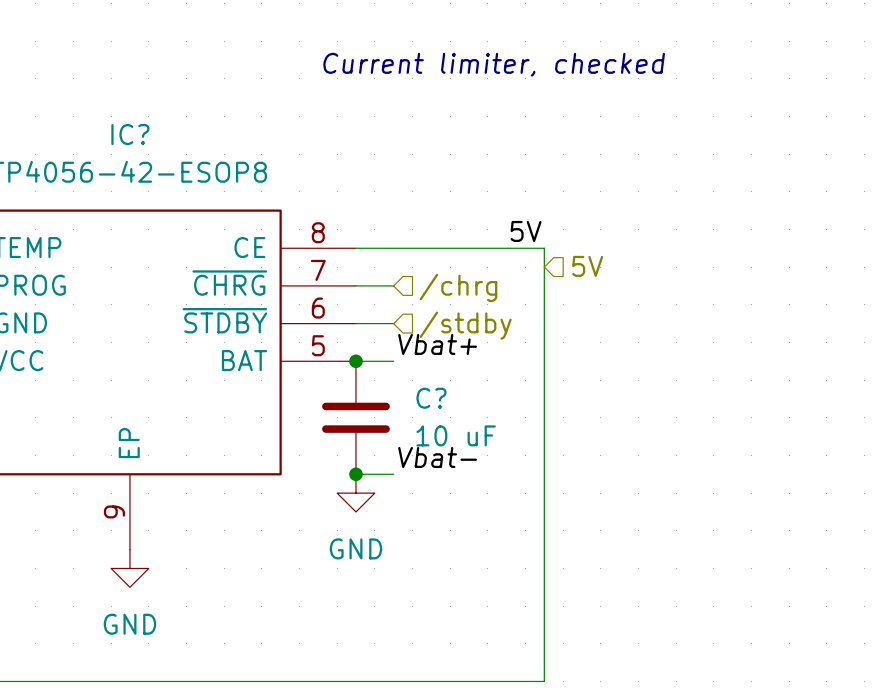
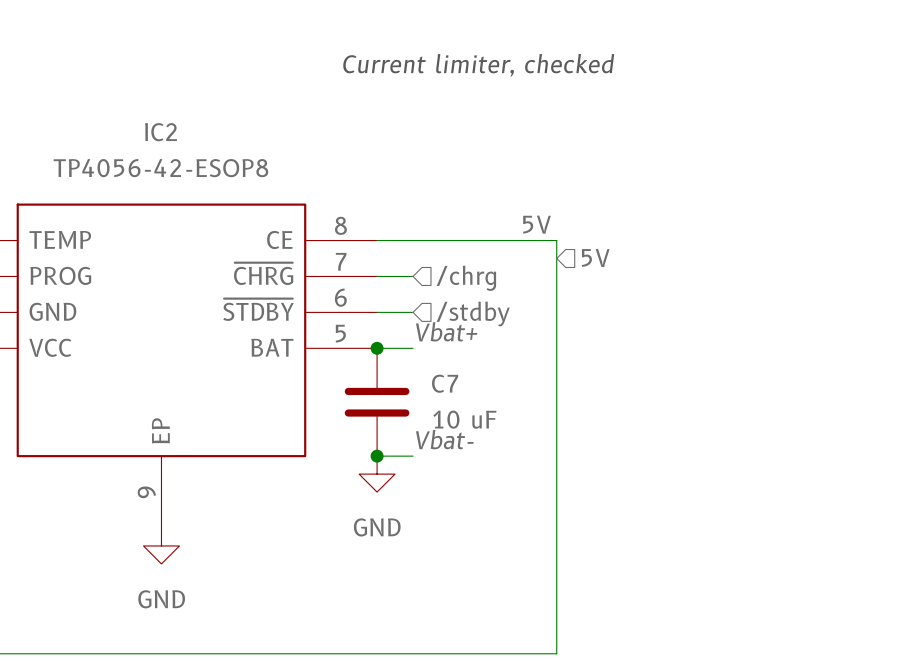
IC? name: IC? (130, 134) -> IC2 (160, 132)
C? name: C? (431, 398) -> C7 (445, 383)

